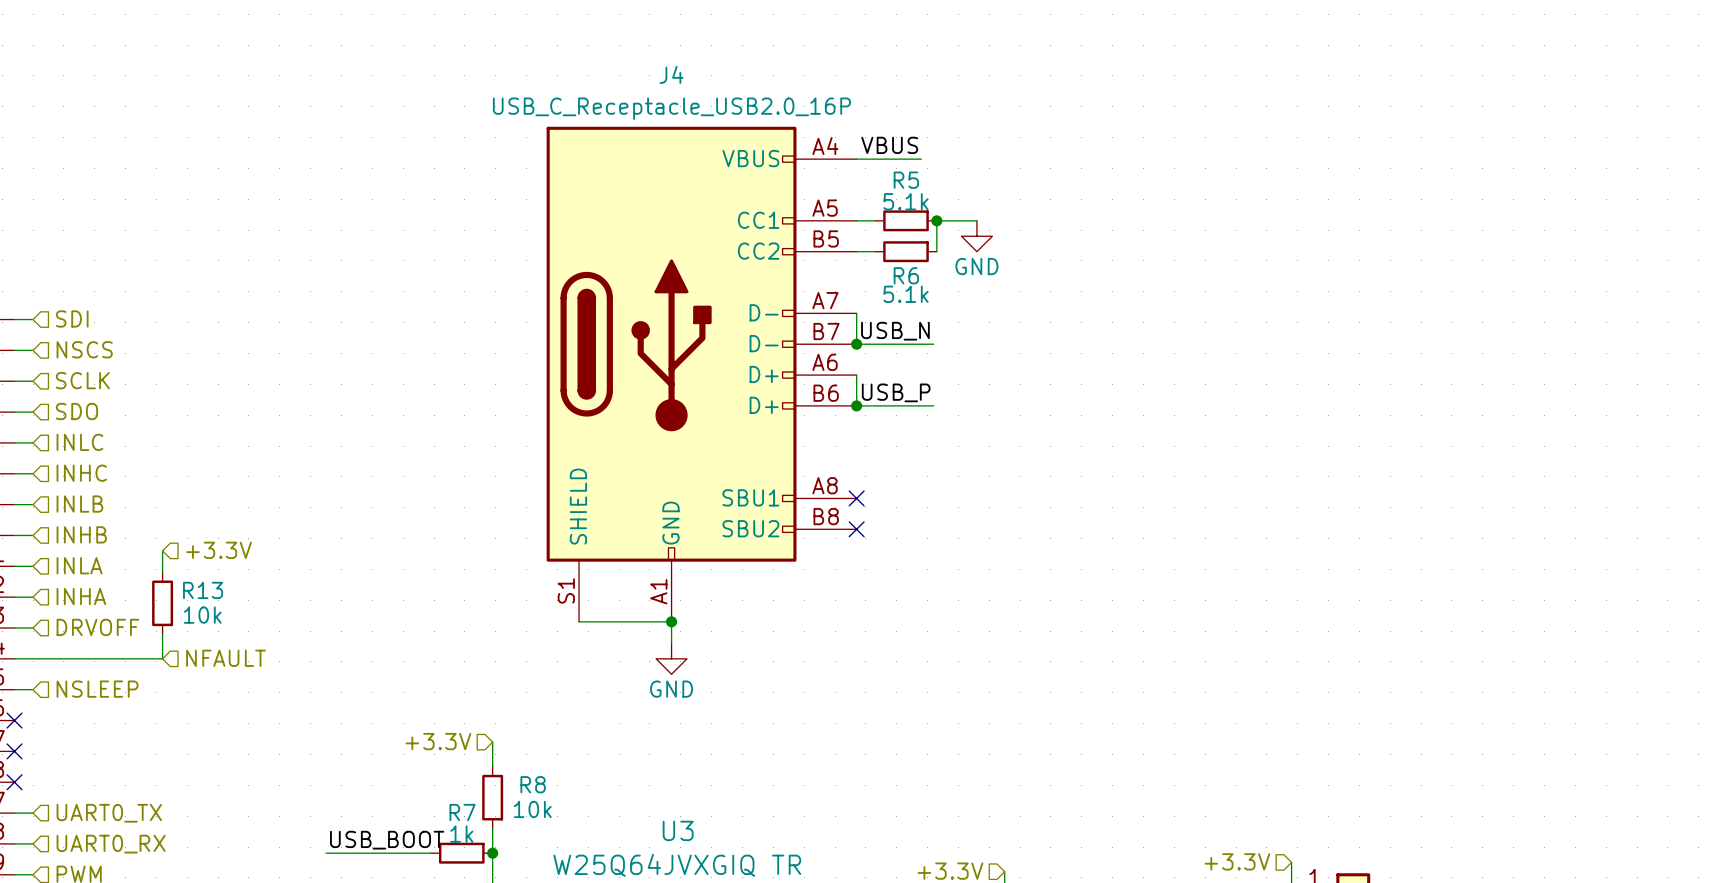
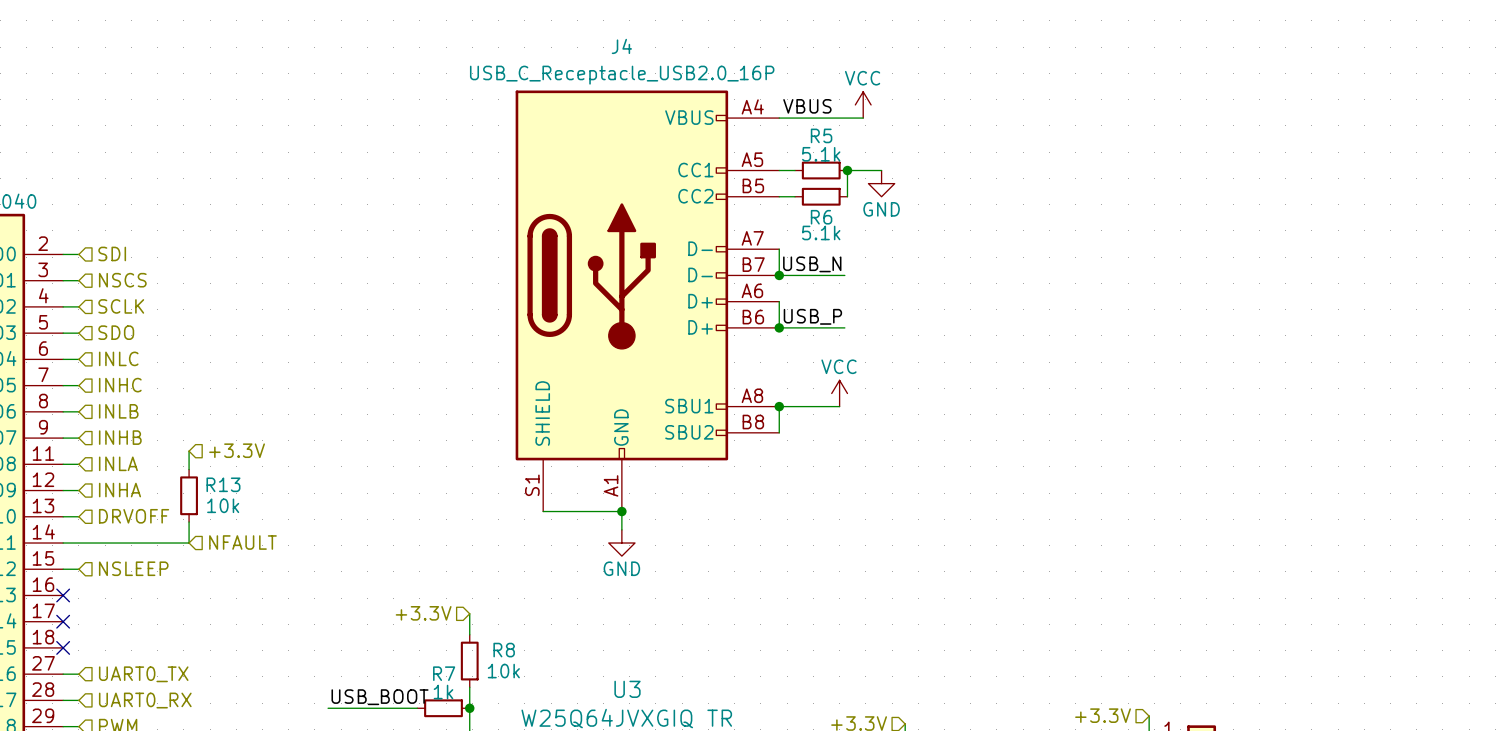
power symbol: none -> VCC (863, 104)
wire: none -> (834, 118) (863, 118)
power symbol: none -> VCC (839, 393)
no-connect mark: (856, 498) -> none
junction: none -> (779, 406)
wire: none -> (839, 406) (779, 406) (779, 432)
no-connect mark: (856, 529) -> none

